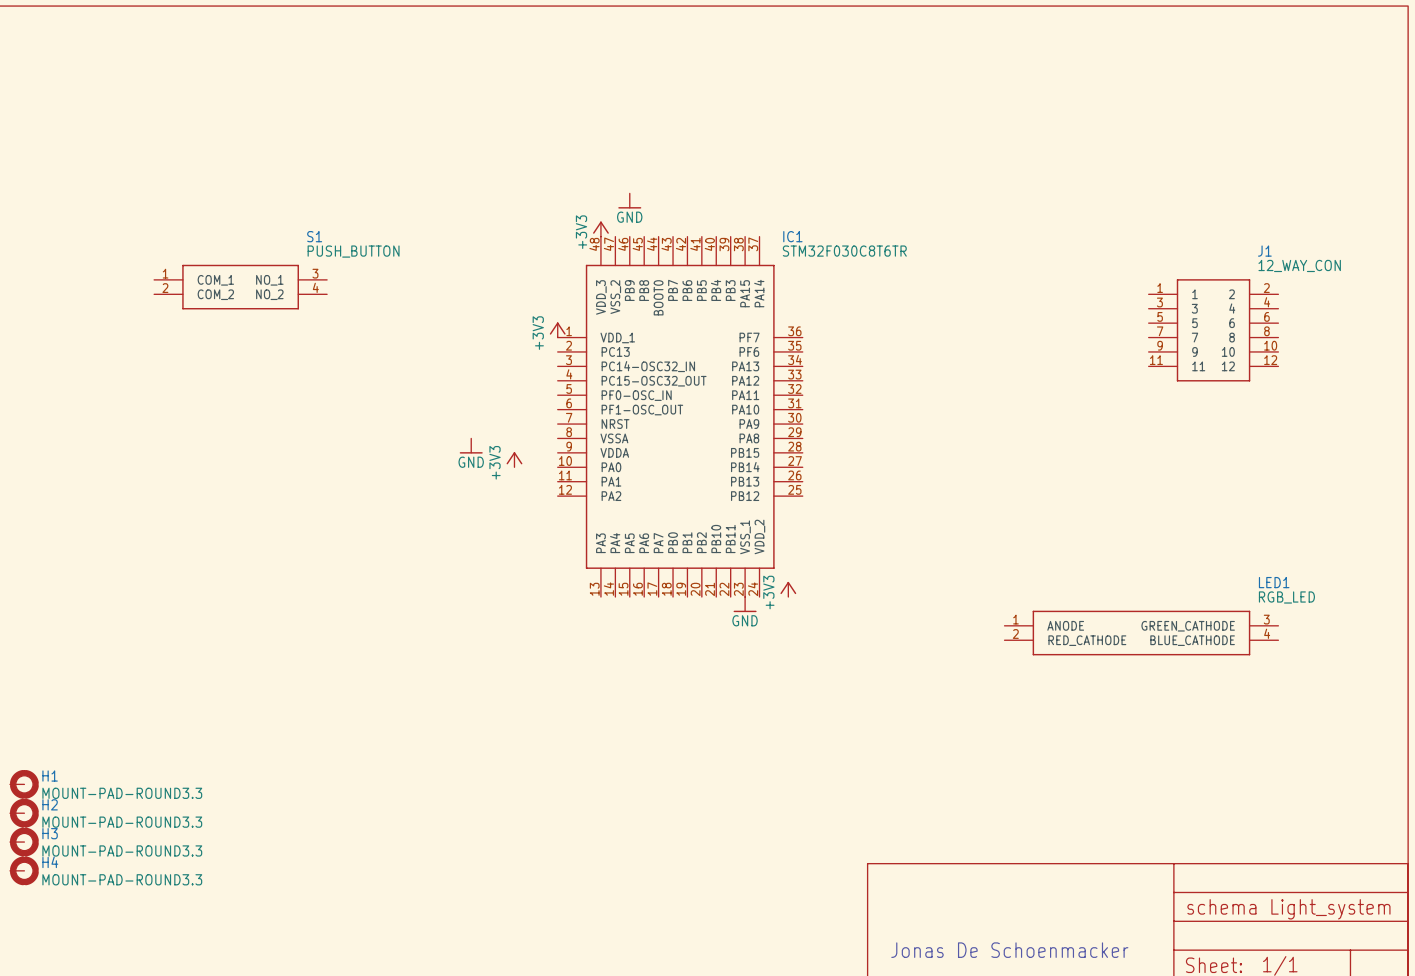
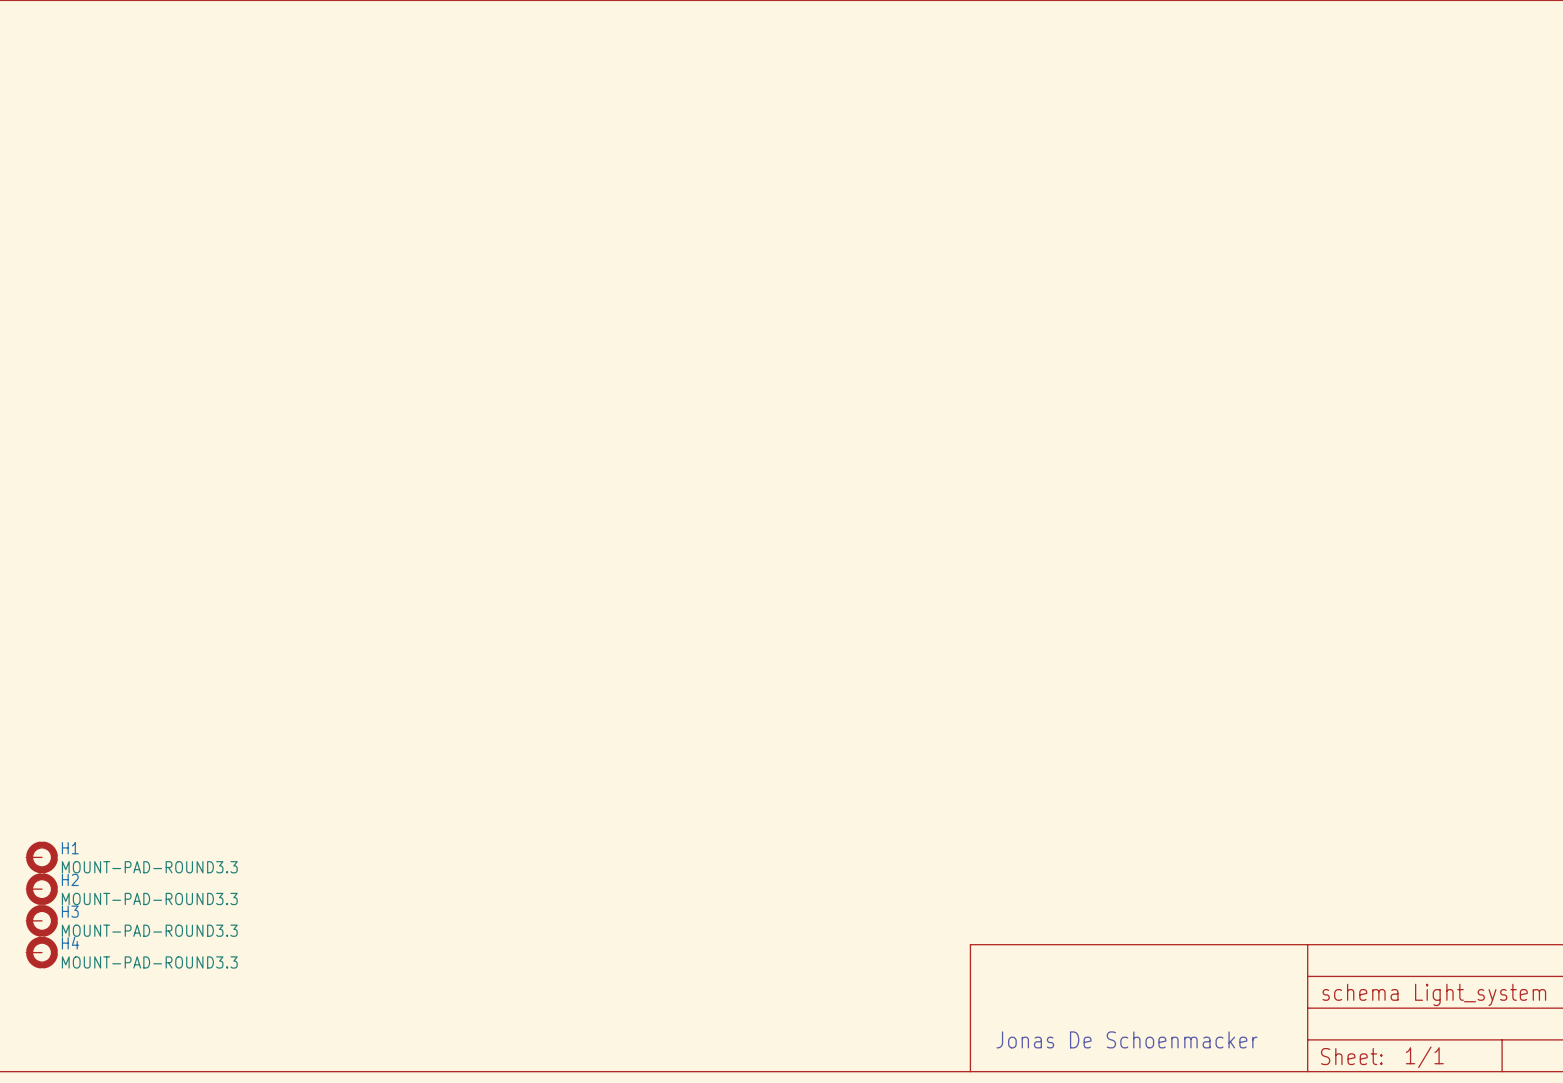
power symbol: GND (629, 200) -> none
power symbol: +3V3 (600, 229) -> none
S1: PUSH_BUTTON (240, 287) -> none
power symbol: +3V3 (557, 329) -> none
J1: 12_WAY_CON (1213, 330) -> none
IC1: STM32F030C8T6TR (680, 416) -> none
power symbol: GND (471, 446) -> none
power symbol: +3V3 (514, 459) -> none
power symbol: +3V3 (788, 589) -> none
power symbol: GND (745, 604) -> none
LED1: RGB_LED (1141, 633) -> none

